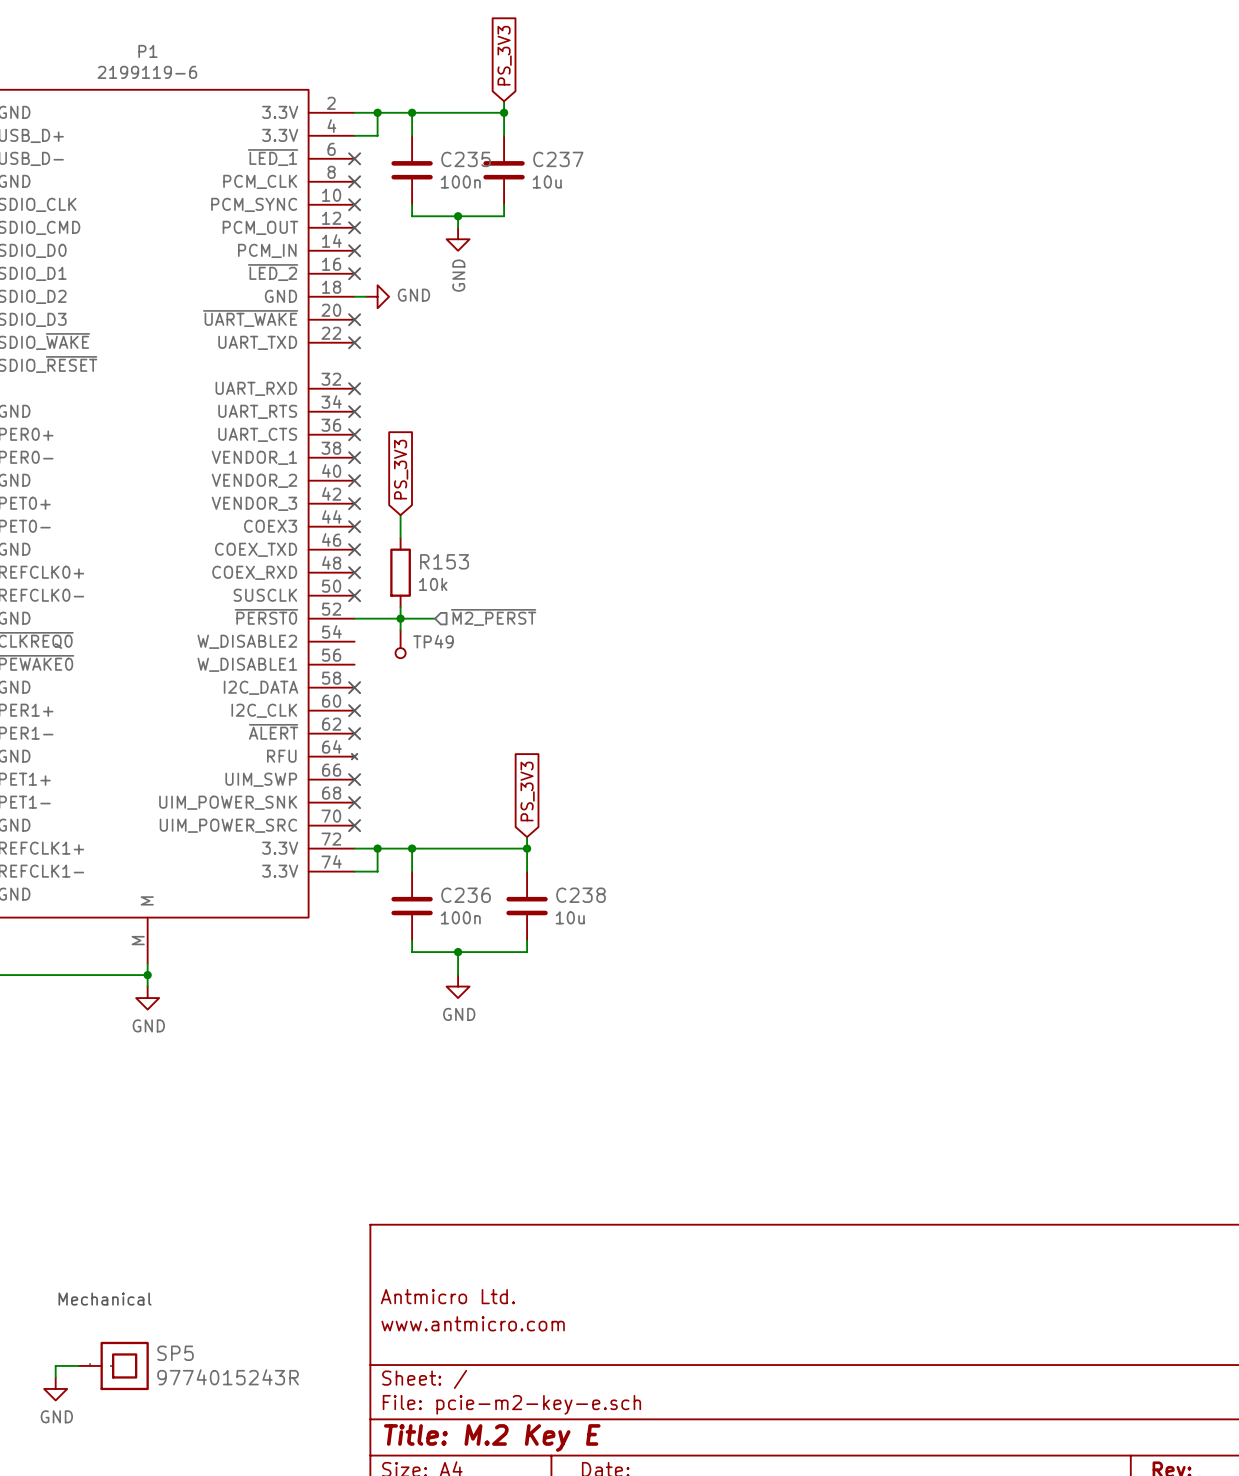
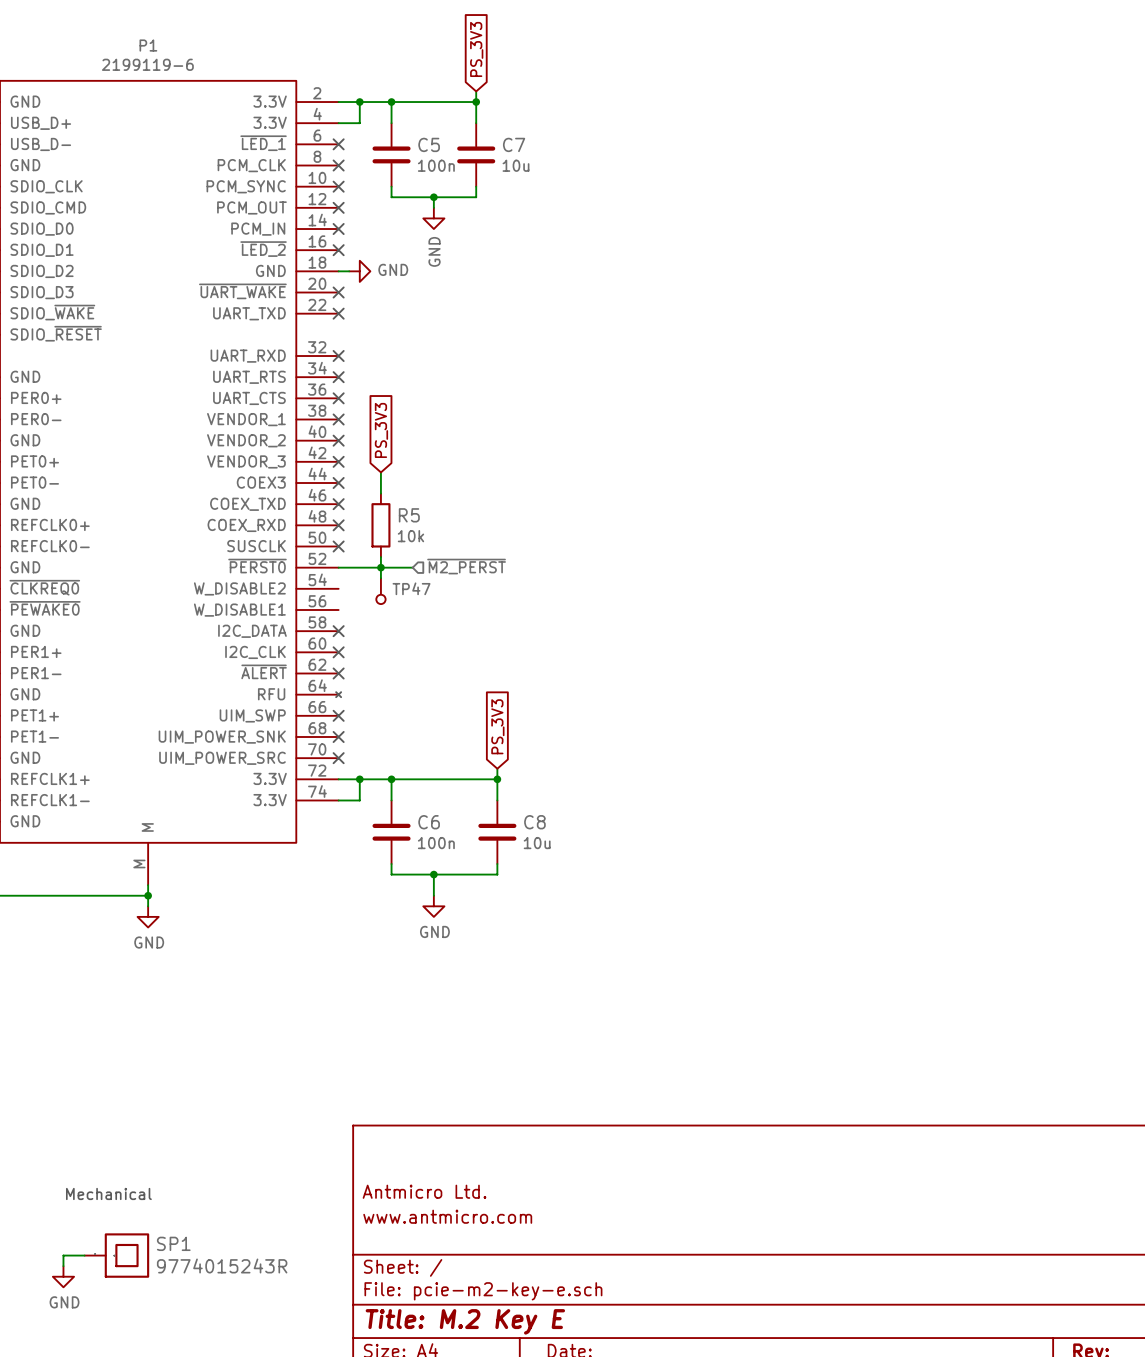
C235 name: C235 (466, 159) -> C5 (429, 144)
C237 name: C237 (558, 159) -> C7 (514, 144)
R153 name: R153 (444, 561) -> R5 (409, 515)
TP49 name: TP49 (433, 641) -> TP47 (411, 588)
C236 name: C236 (466, 895) -> C6 (429, 822)
C238 name: C238 (581, 895) -> C8 (534, 822)
SP5 name: SP5 (175, 1353) -> SP1 (173, 1243)

